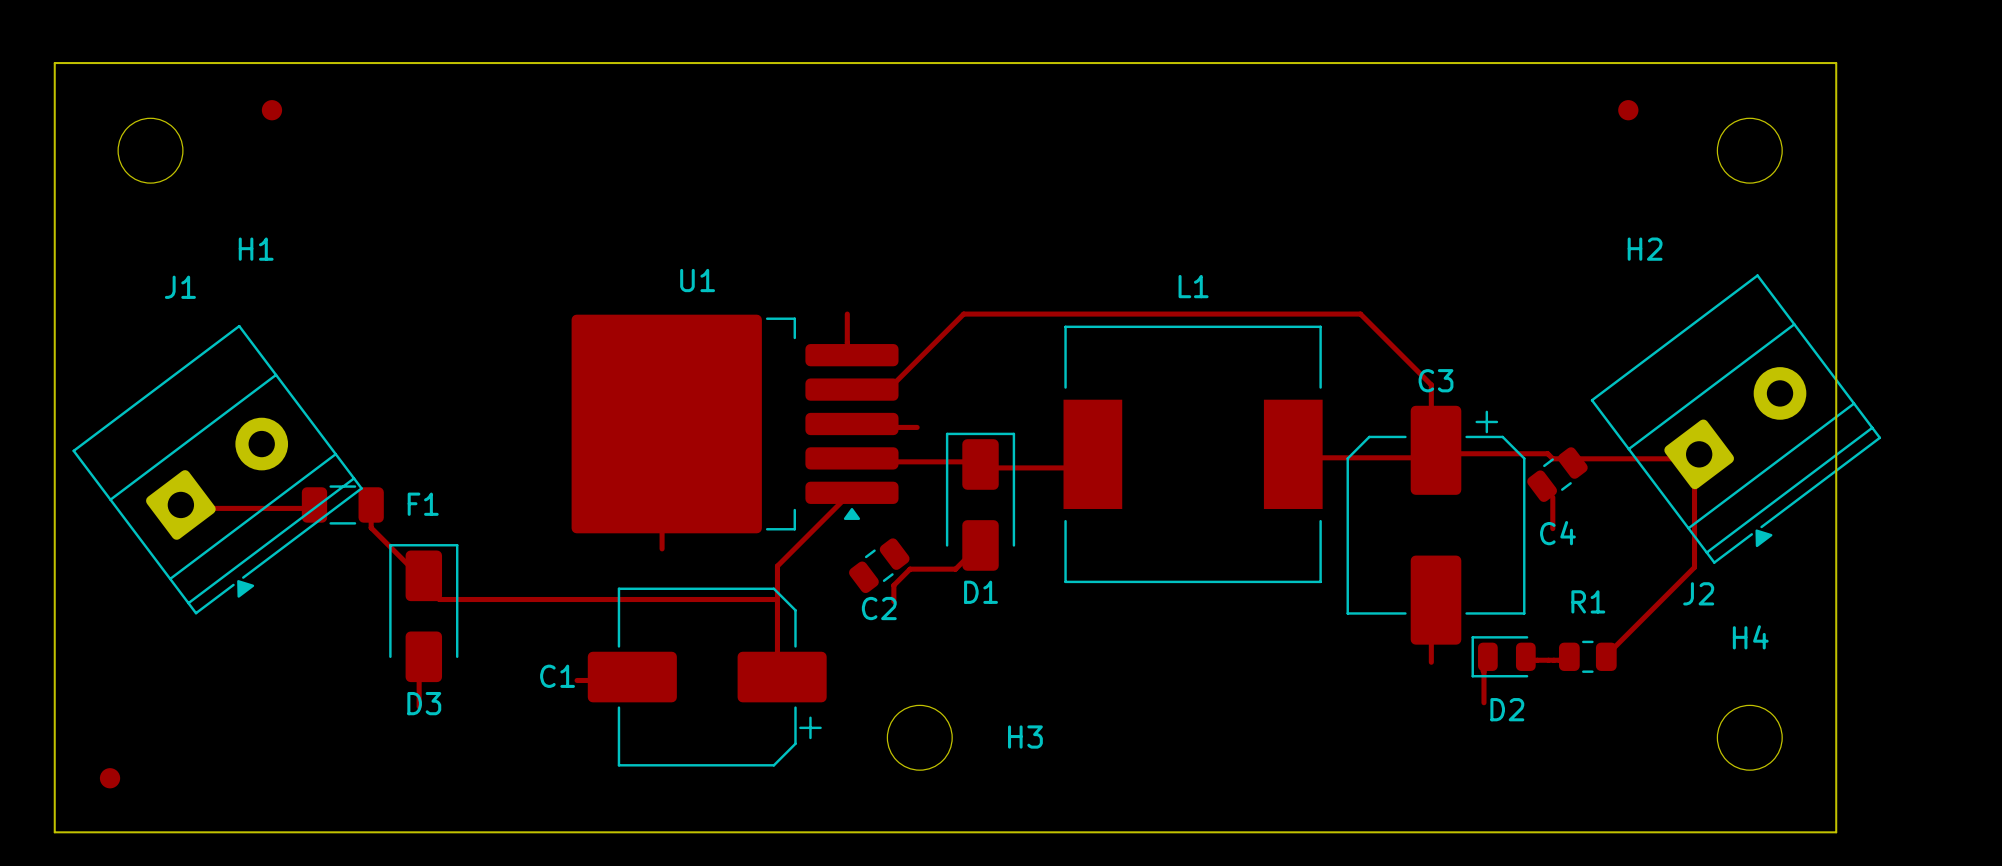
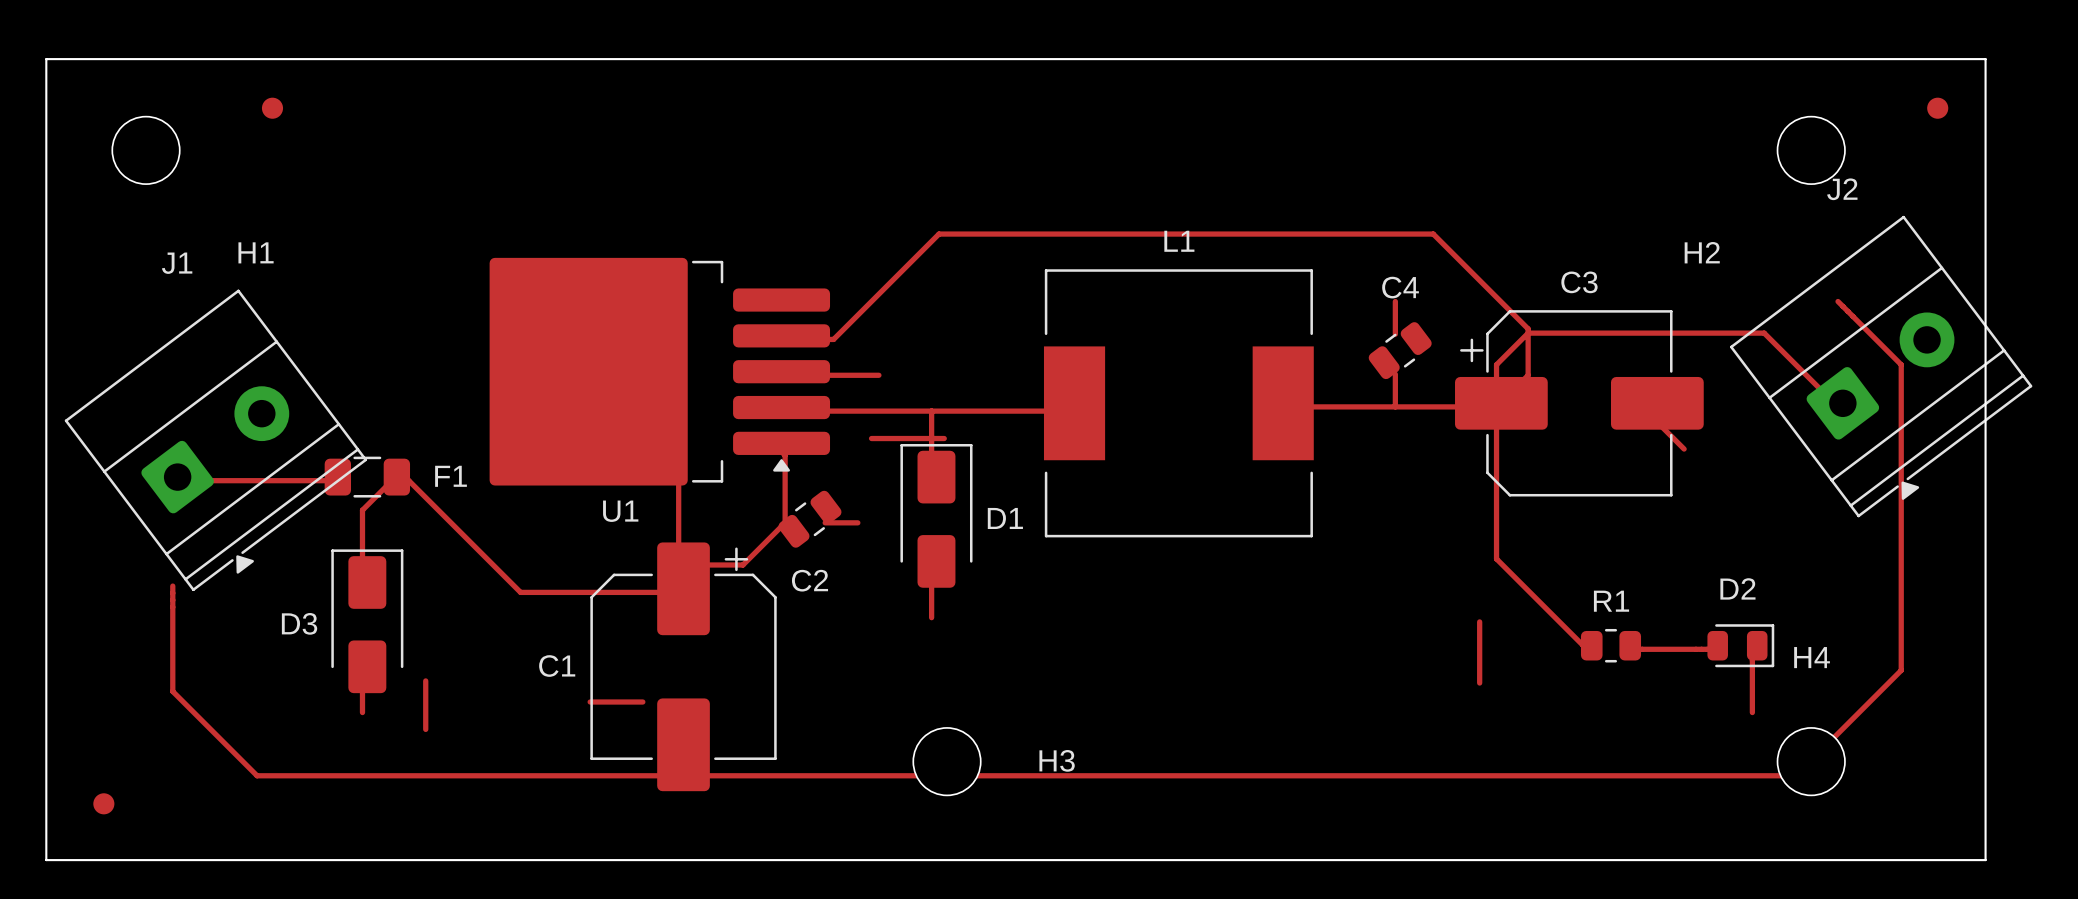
board edge: (1836, 63) (1836, 832) -> (1901, 59) (1985, 59) (1985, 860) (1901, 860)
part position: (1628, 110) -> (1937, 108)
U1 name position: U1 (697, 280) -> U1 (620, 511)
L1 name position: L1 (1193, 286) -> L1 (1179, 241)
J1 name position: J1 (180, 287) -> J1 (177, 263)
track: none -> (1395, 301) (1395, 334)
track: none -> (1838, 301) (1901, 364) (1901, 670) (1795, 775) (257, 775) (172, 691) (172, 586)
track: (847, 314) (847, 358) -> none
track: none -> (776, 339) (833, 339) (939, 234) (1433, 234) (1528, 328) (1528, 375) (1496, 406) (1278, 406)
track: none -> (776, 375) (878, 375)
track: (847, 393) (884, 393) (963, 314) (1360, 314) (1431, 384) (1431, 453) -> none
track: none -> (1069, 406) (1065, 411) (776, 411)
track: none -> (1652, 406) (1652, 417) (1684, 449)
track: none -> (1838, 406) (1764, 333) (1528, 333) (1496, 364) (1496, 558) (1586, 649)
track: none -> (931, 411) (931, 480)
J2 position: (1735, 419) -> (1881, 366)
U1 position: (735, 423) -> (659, 371)
track: none -> (776, 446) (785, 455) (785, 522) (742, 564) (692, 564) (678, 578) (678, 592) (520, 592) (408, 480) (392, 480) (362, 510) (362, 586)
track: (1431, 453) (1547, 453) (1552, 458) (1693, 458) -> none
track: (1431, 453) (1427, 457) (1288, 457) -> none
L1 position: (1193, 454) -> (1178, 403)
track: (1088, 457) (1078, 467) (975, 467) (969, 461) (847, 461) -> none
track: (1694, 457) (1694, 567) (1601, 660) -> none
track: none -> (172, 480) (332, 480)
J1 position: (217, 469) -> (215, 440)
C4 position: (1557, 474) -> (1400, 350)
track: (847, 496) (777, 566) (777, 680) -> none
track: (1552, 497) (1552, 528) -> (1395, 374) (1395, 406)
D1 position: (980, 501) -> (936, 515)
F1 position: (342, 504) -> (367, 477)
track: (176, 508) (309, 508) -> none
track: (366, 508) (371, 508) (371, 527) (419, 575) (419, 579) (439, 599) (777, 599) -> none
track: none -> (825, 522) (857, 522)
C3 rotation: 0° (1436, 525) -> 90° counterclockwise (1579, 403)
C3 position: (1436, 525) -> (1579, 403)
C4 name position: C4 (1557, 533) -> C4 (1400, 287)
track: none -> (931, 564) (931, 617)
track: (975, 548) (955, 569) (910, 569) (893, 585) (893, 601) -> none
C2 position: (879, 565) -> (810, 519)
D1 name position: D1 (980, 592) -> D1 (1005, 518)
J2 name position: J2 (1698, 593) -> J2 (1842, 189)
R1 name position: R1 (1588, 601) -> R1 (1611, 601)
C2 name position: C2 (879, 608) -> C2 (810, 580)
D3 position: (423, 613) -> (367, 621)
track: none -> (1625, 649) (1712, 649)
track: none -> (1752, 649) (1752, 712)
track: none -> (362, 670) (362, 712)
D2 rotation: 0° (1503, 656) -> 180° (1740, 645)
D2 position: (1503, 656) -> (1740, 645)
R1 position: (1587, 656) -> (1610, 645)
track: (1483, 660) (1483, 702) -> none
track: (1521, 660) (1564, 660) -> none
C1 rotation: 0° (707, 677) -> 90° counterclockwise (683, 666)
D3 name position: D3 (424, 703) -> D3 (299, 623)

